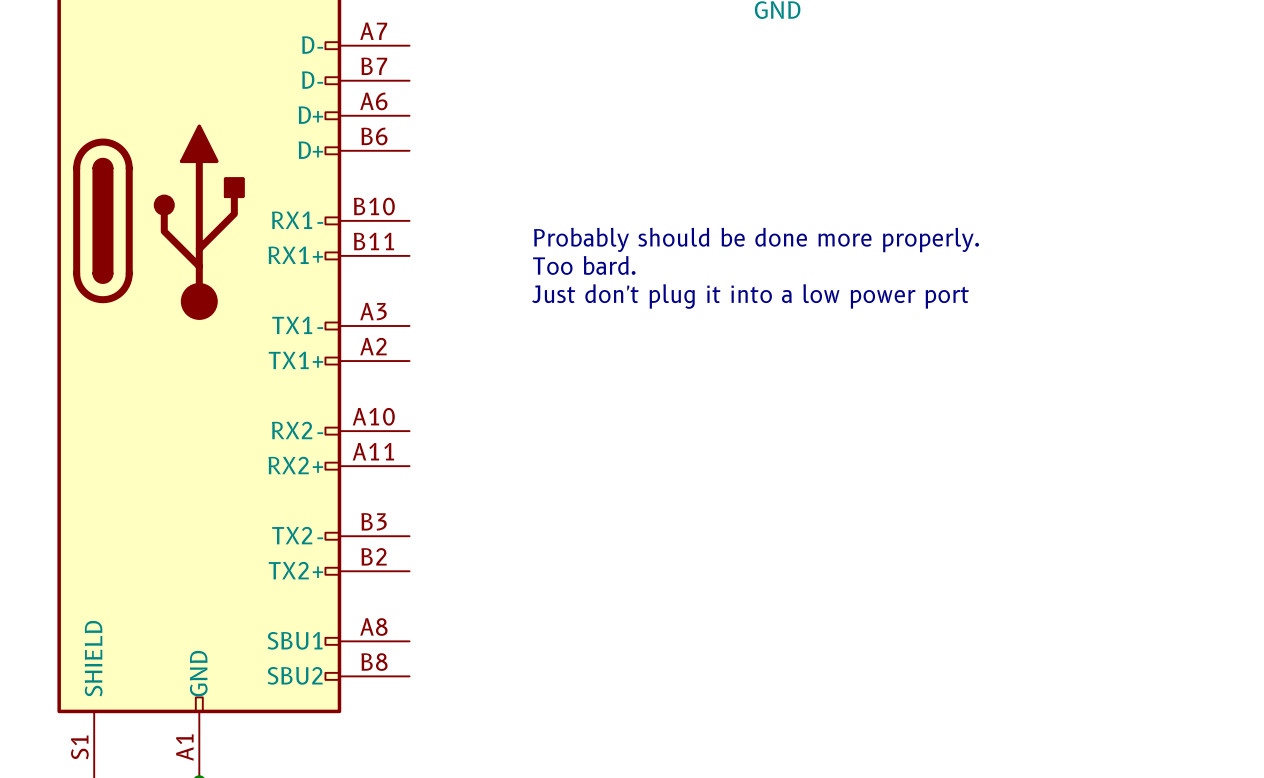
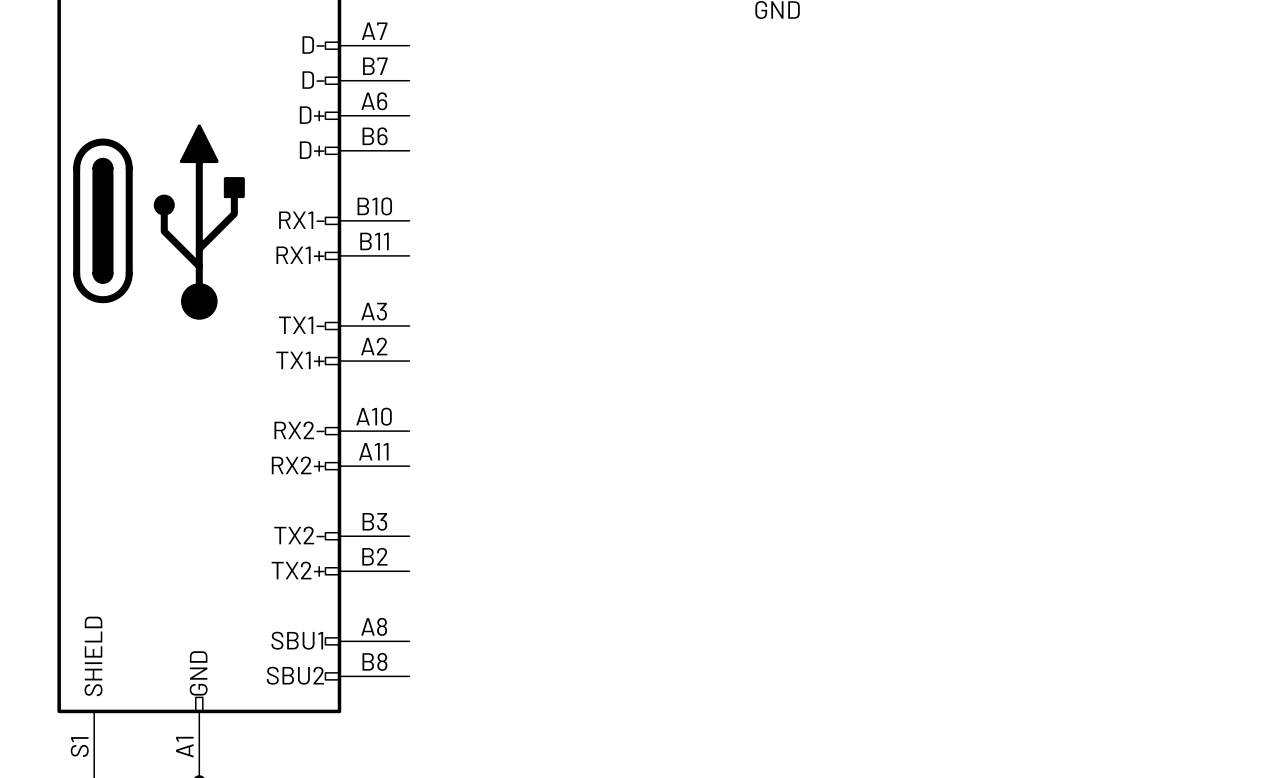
text: Probably should be done more properly. (756, 240) -> none
text: Too bard. (584, 265) -> none
text: Just don't plug it into a low power port (750, 296) -> none

